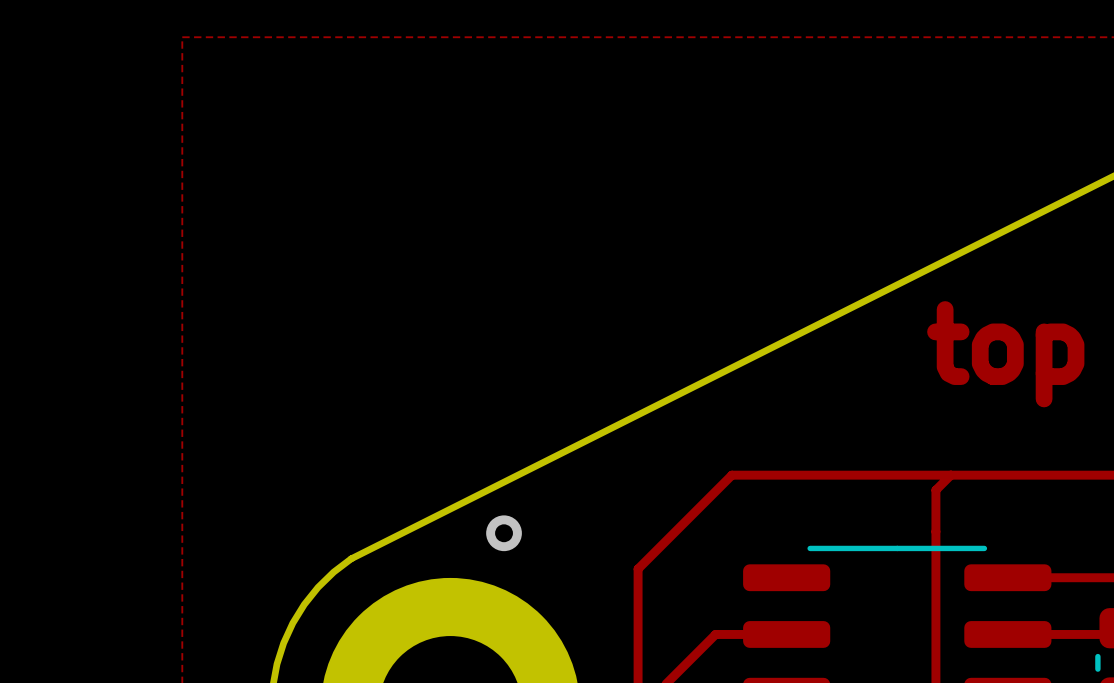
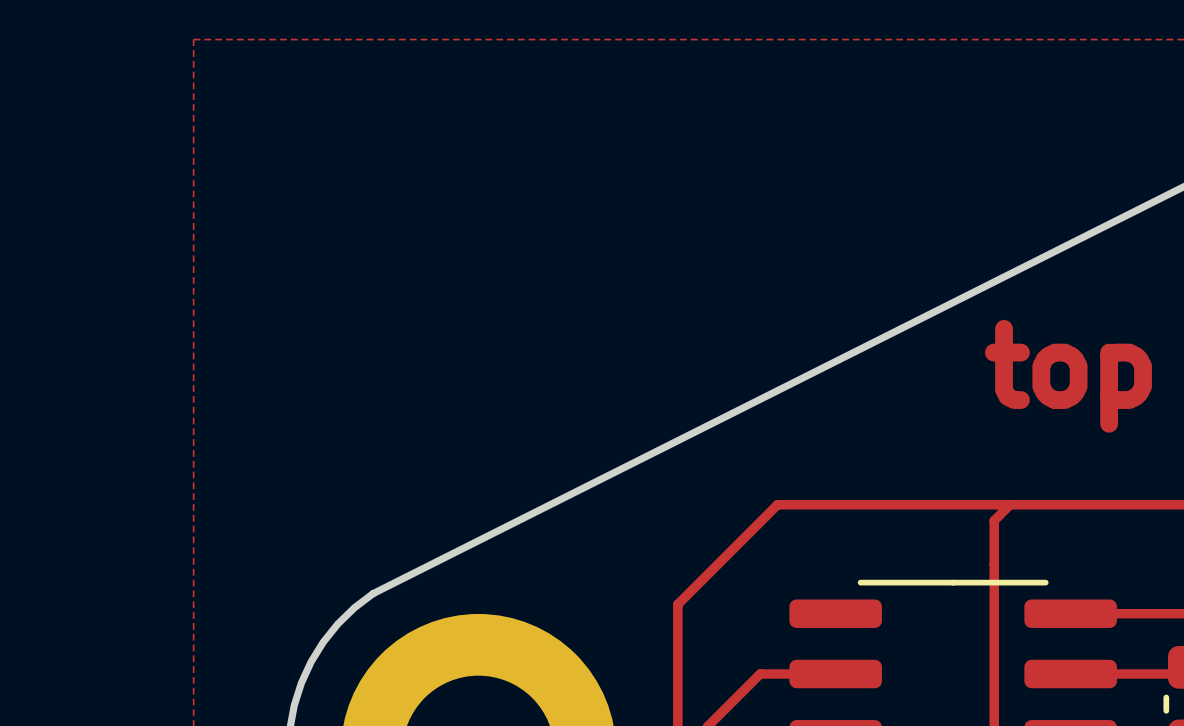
via: (504, 533) -> none

